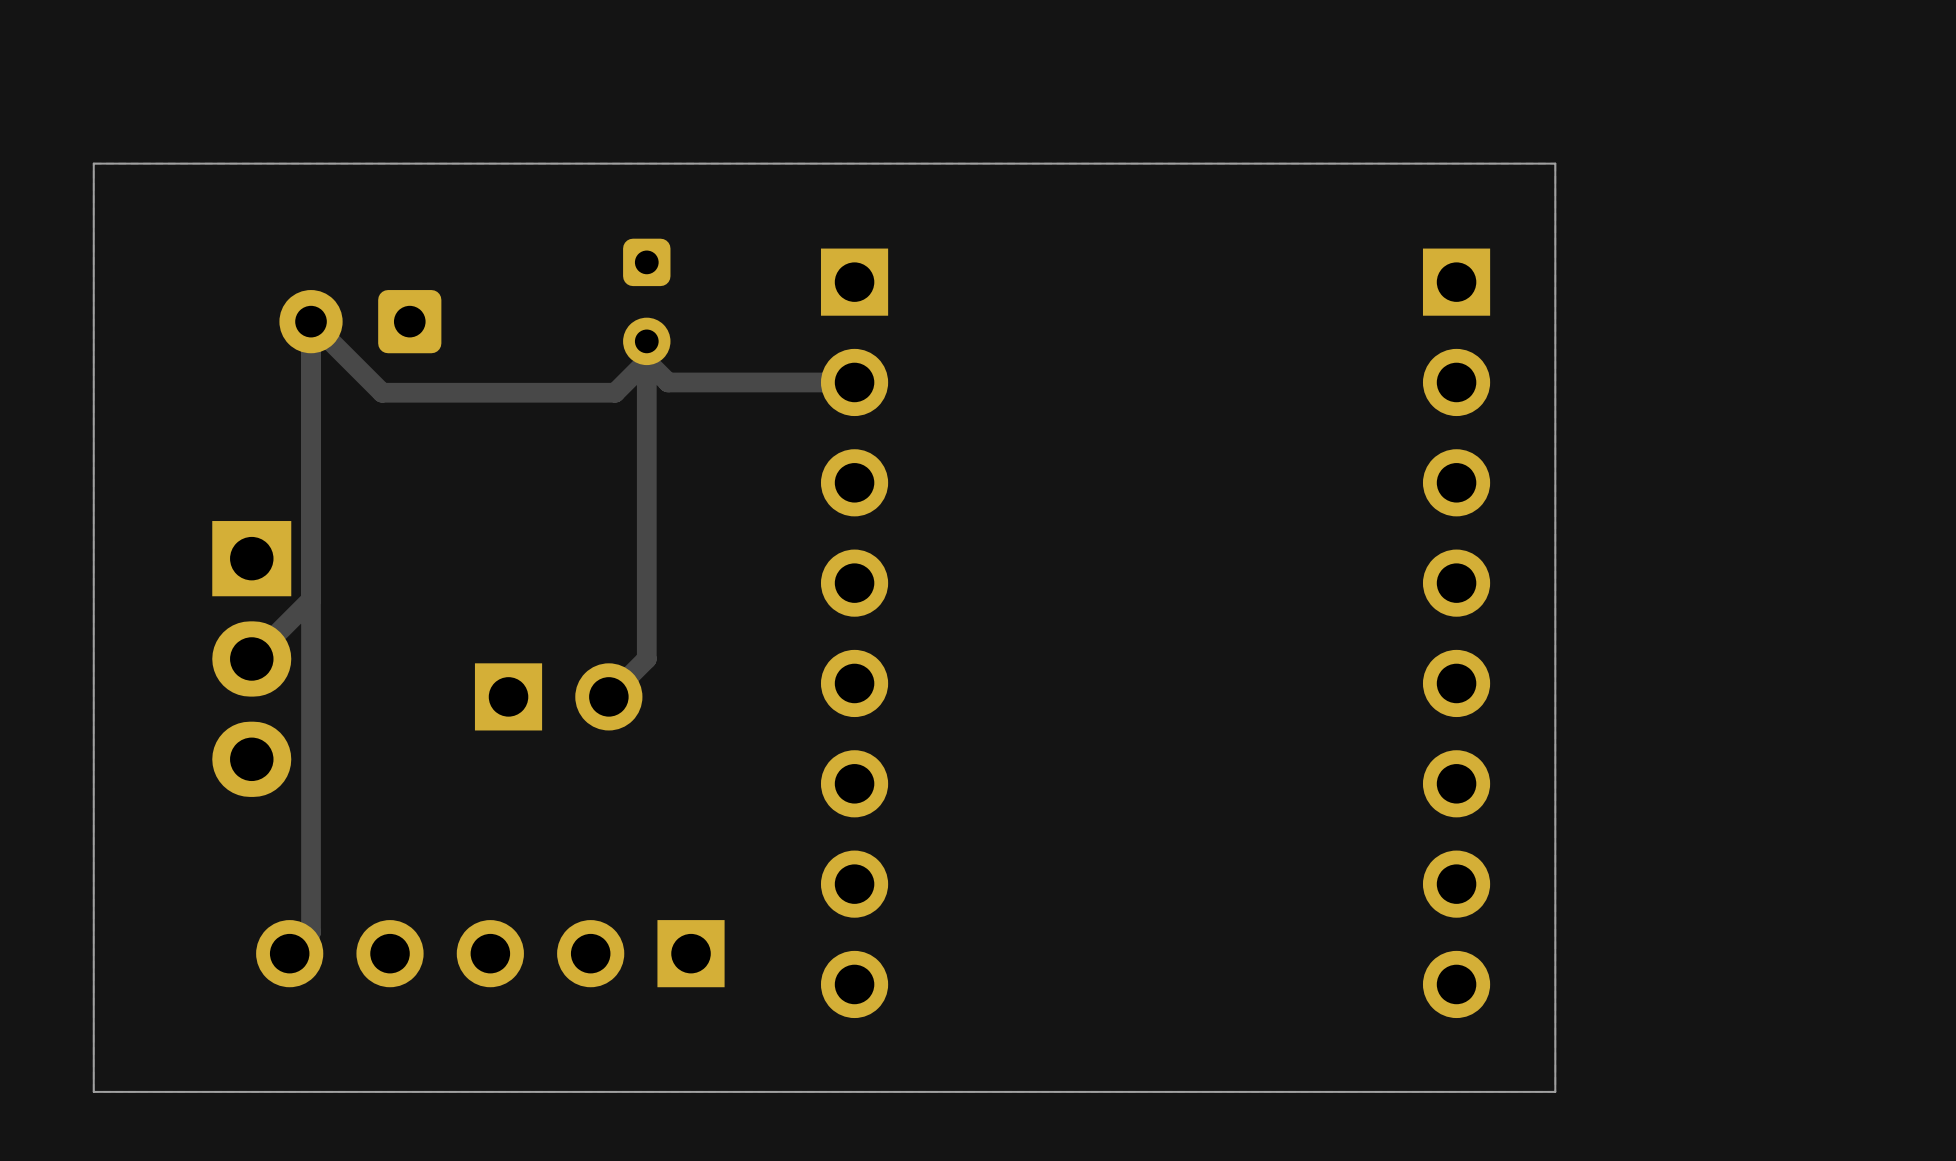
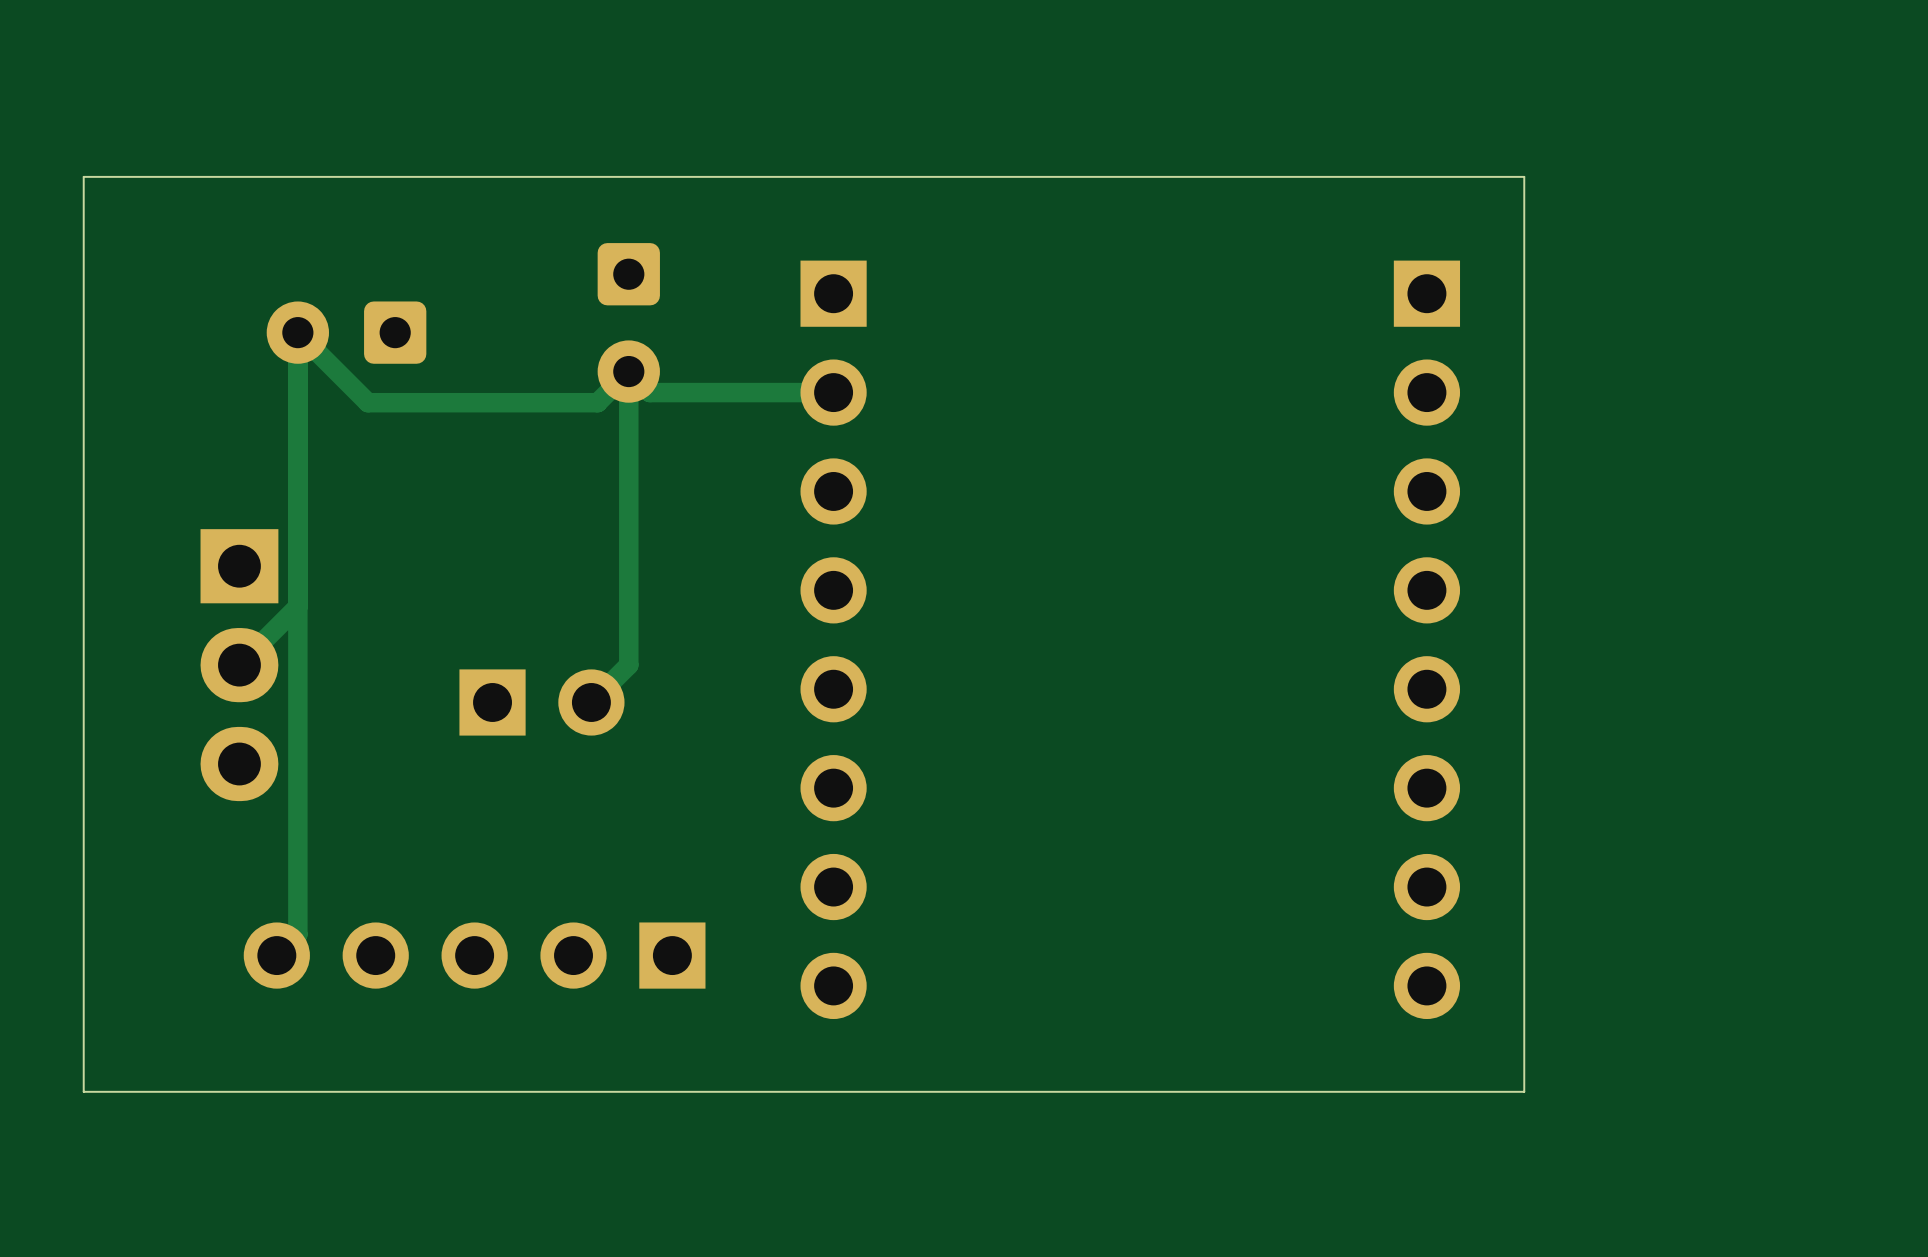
part footprint: [623, 238, 671, 366] -> [597, 243, 660, 403]

